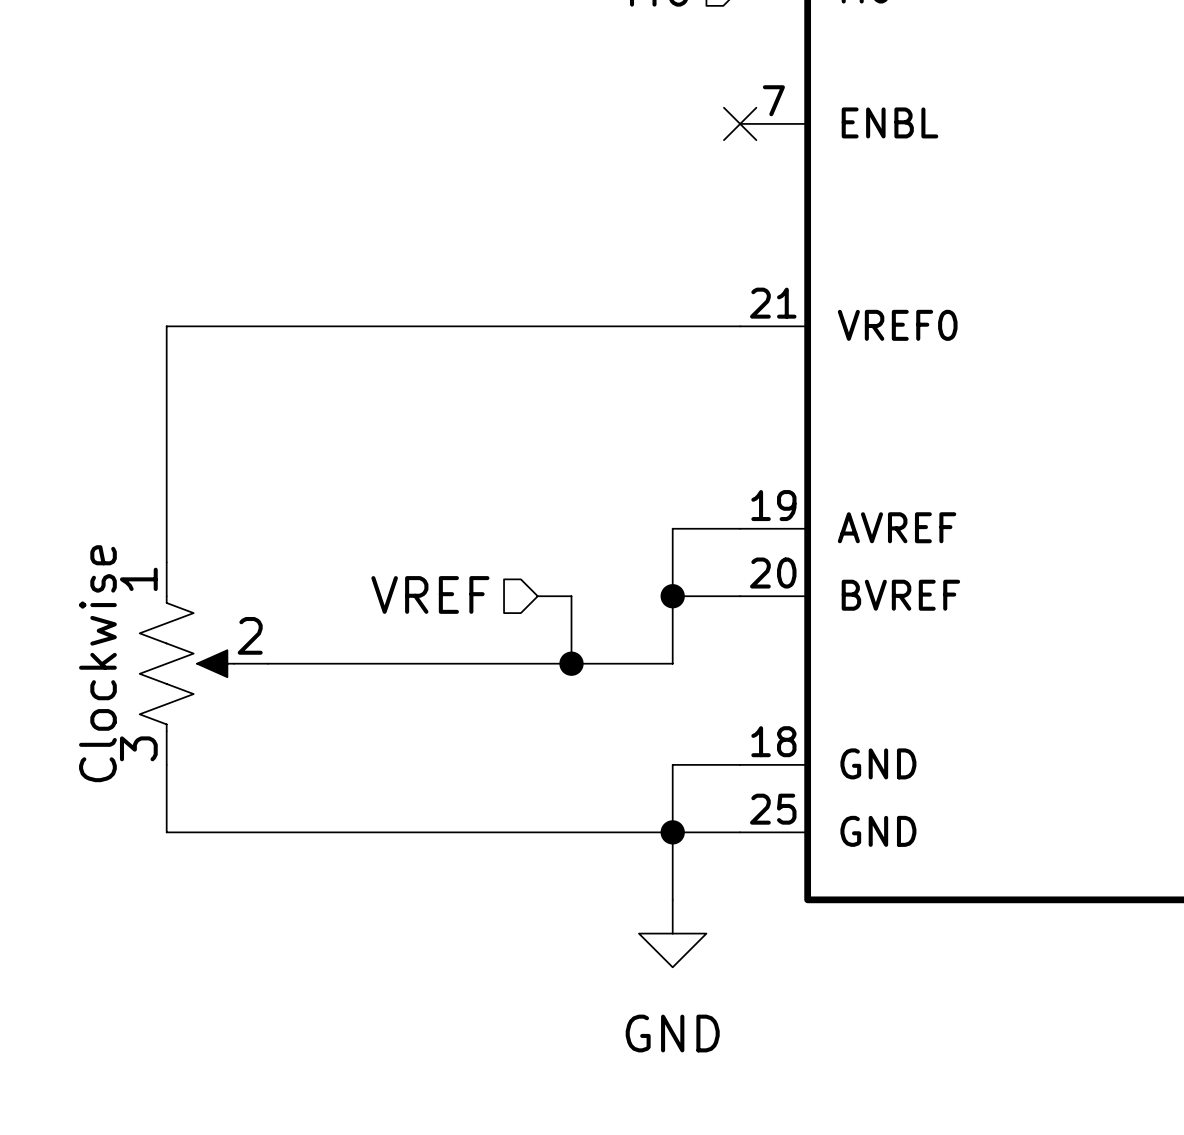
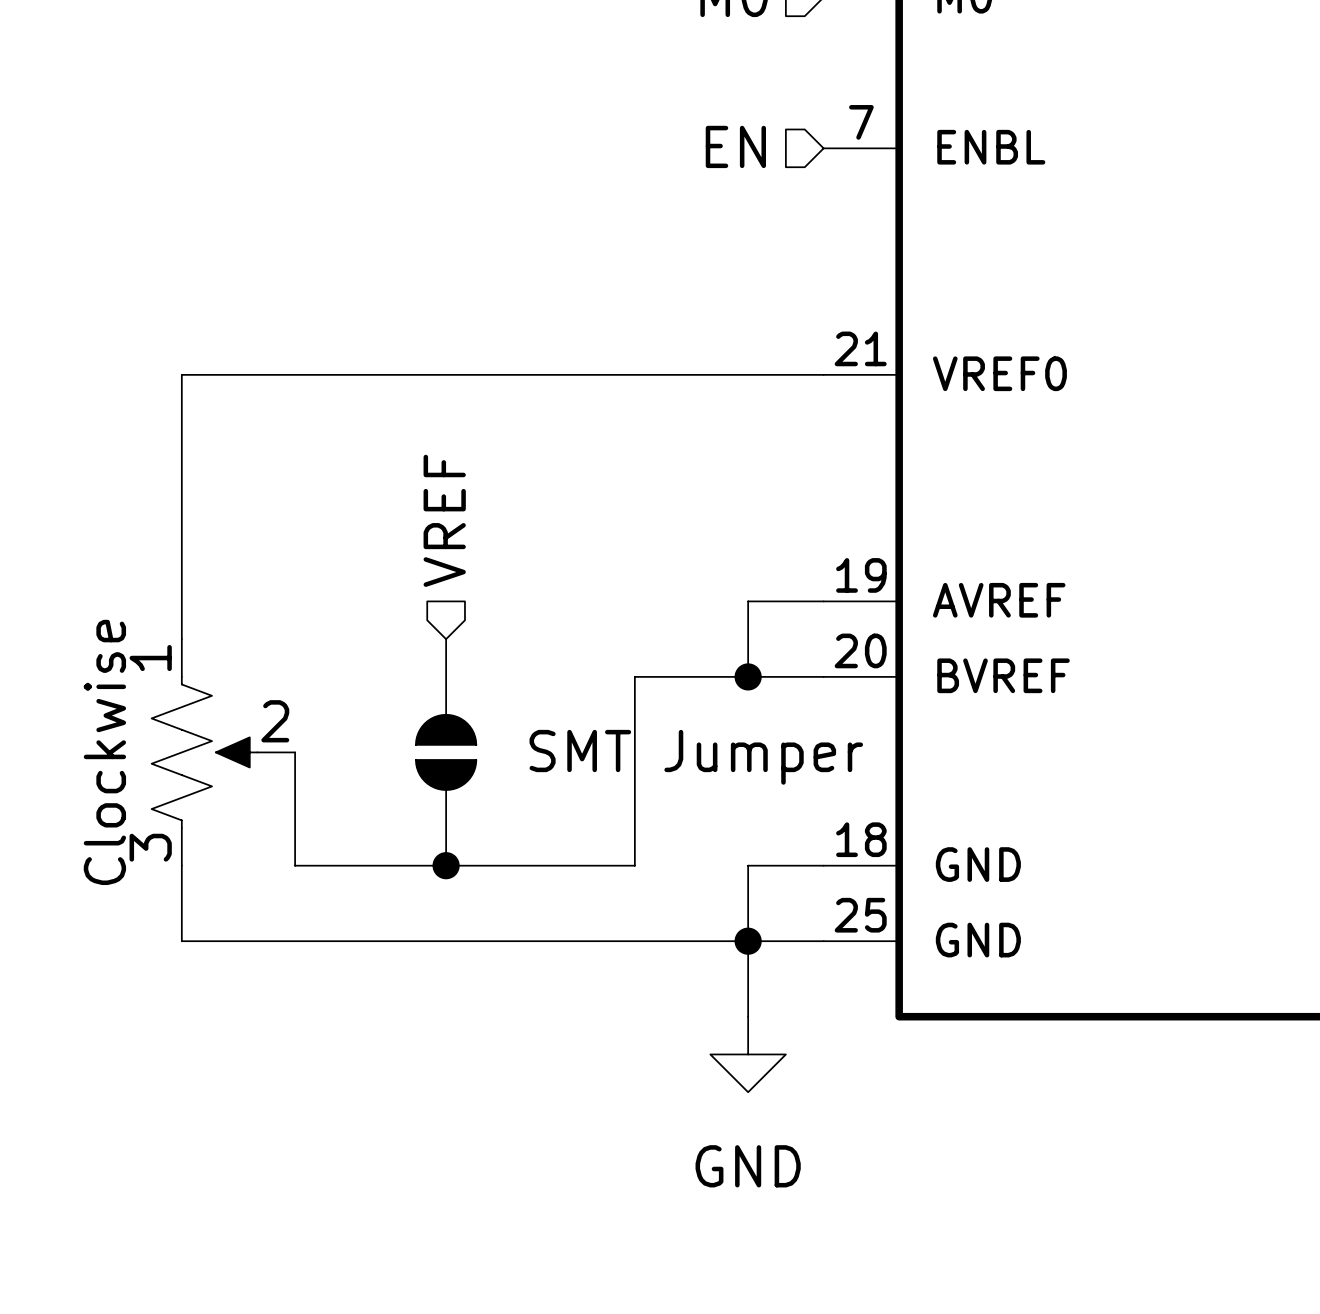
hierarchical label: none -> EN (735, 146)
no-connect mark: (740, 123) -> none
hierarchical label rotation: 0° (430, 594) -> 90° clockwise (444, 520)
hierarchical label position: VREF (430, 594) -> VREF (444, 520)
wire: (537, 596) (571, 596) -> (748, 676) (634, 676)
wire: (672, 596) (672, 663) (267, 663) -> (634, 752) (634, 865) (295, 865) (295, 752)
part: none -> SMT Jumper (446, 752)
junction: (571, 663) -> none
junction: none -> (446, 865)

